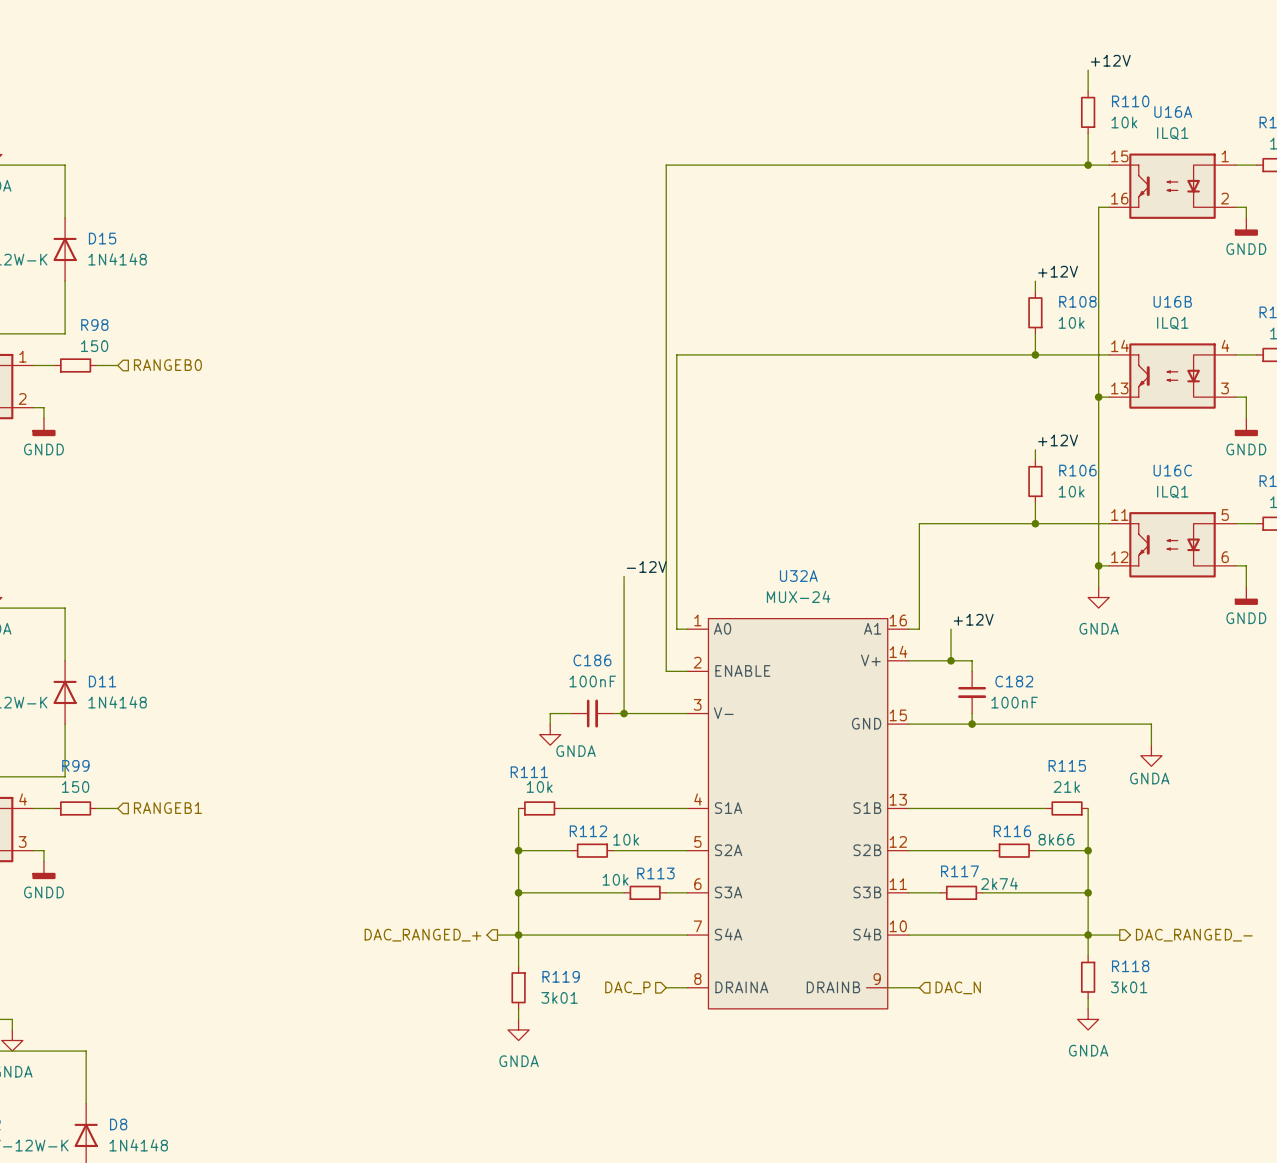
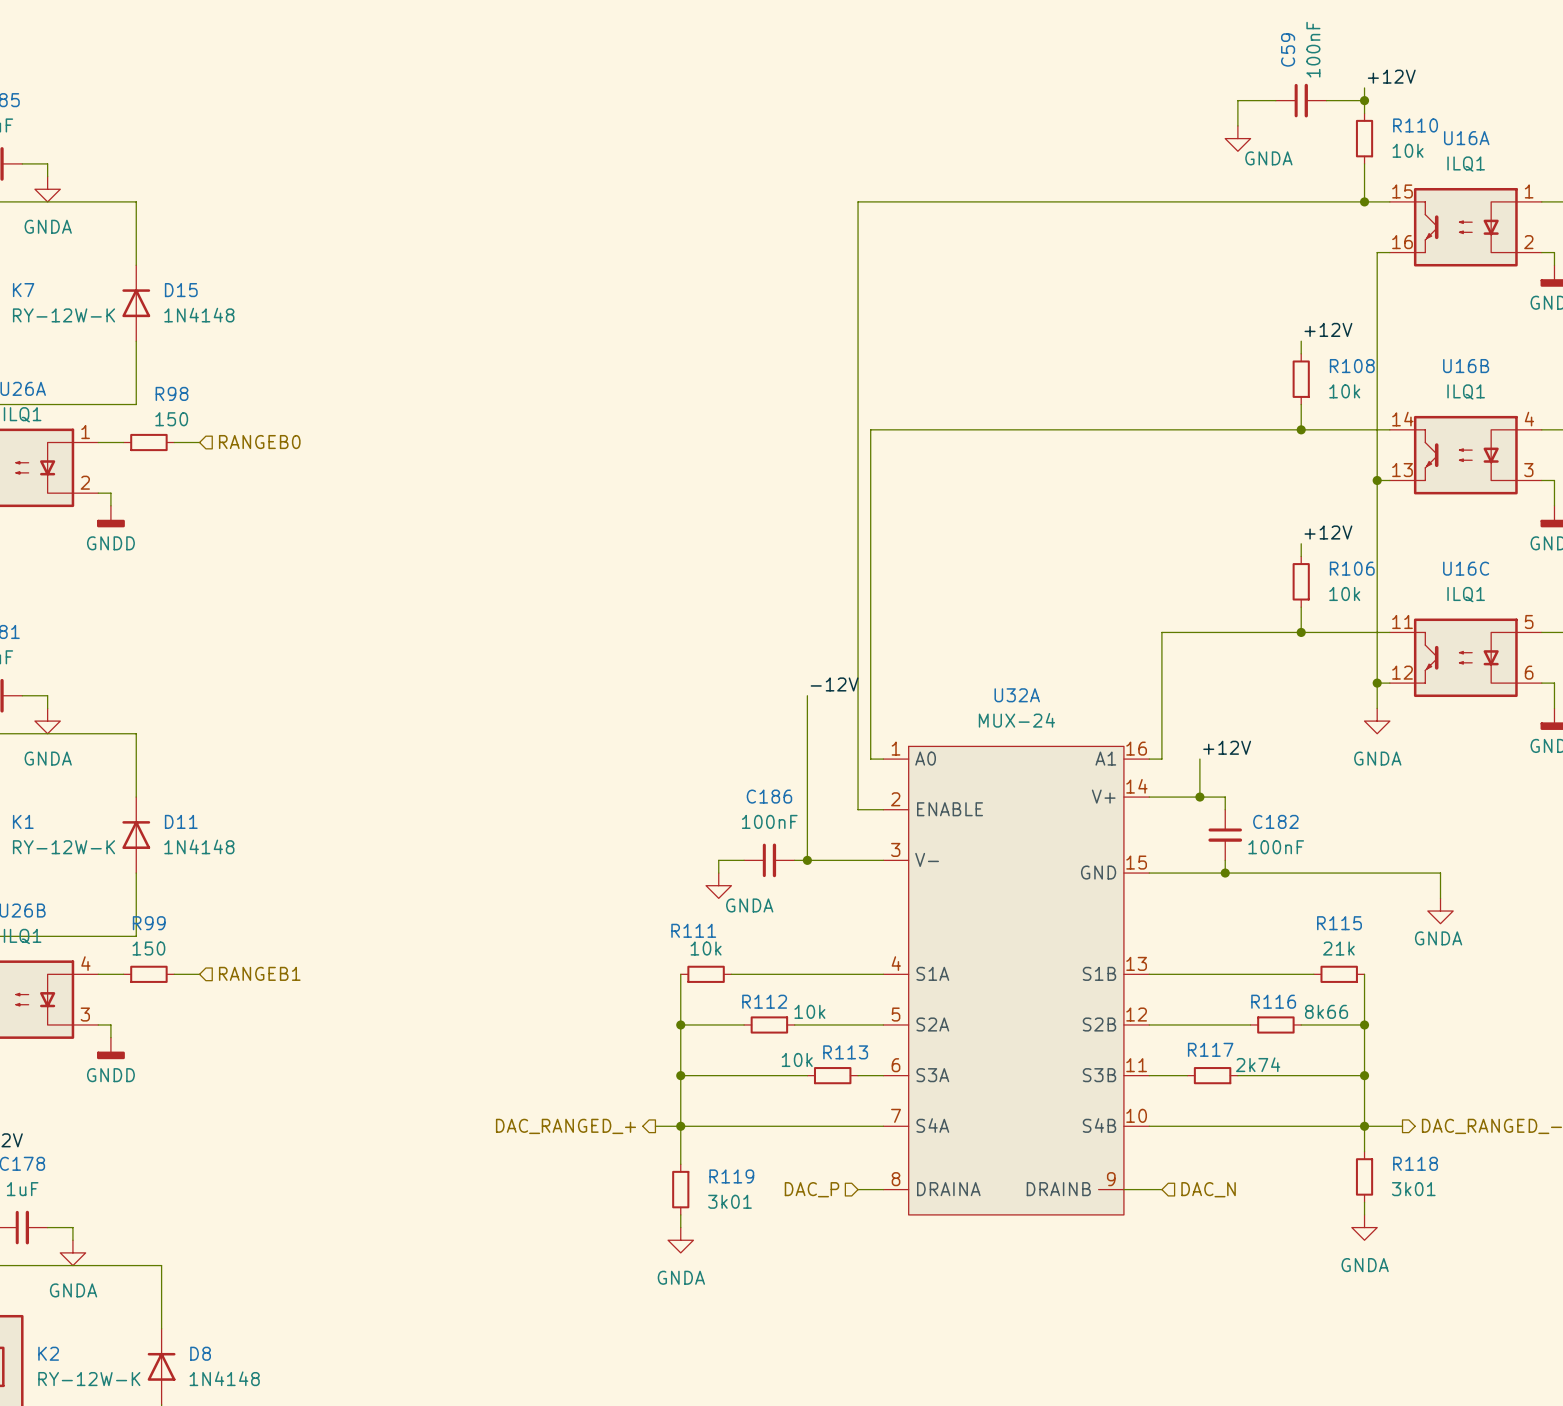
wire: none -> (1275, 100) (1237, 100) (1237, 125)
C59: none -> 100nF (1301, 100)
wire: none -> (1326, 100) (1364, 100)
junction: none -> (1364, 100)
power symbol: none -> GNDA (1237, 138)

